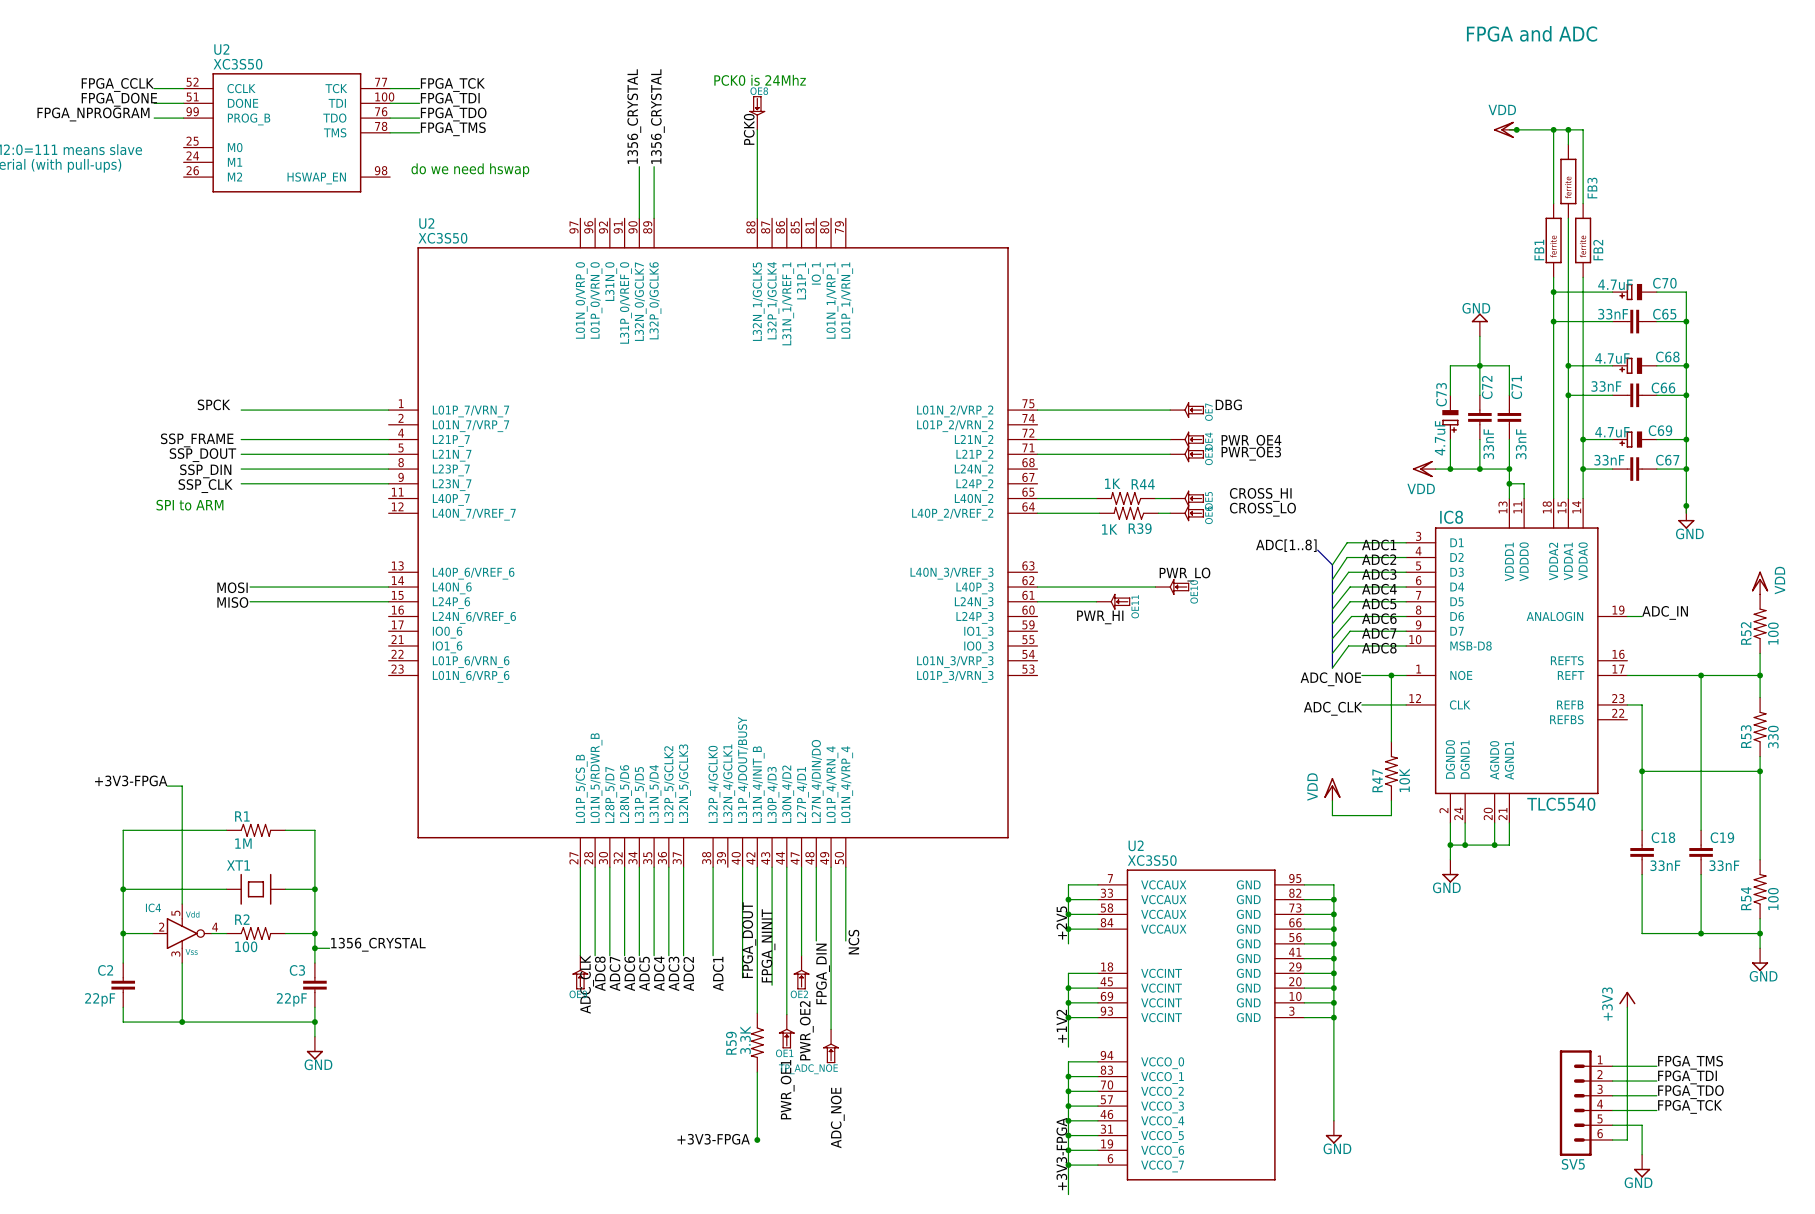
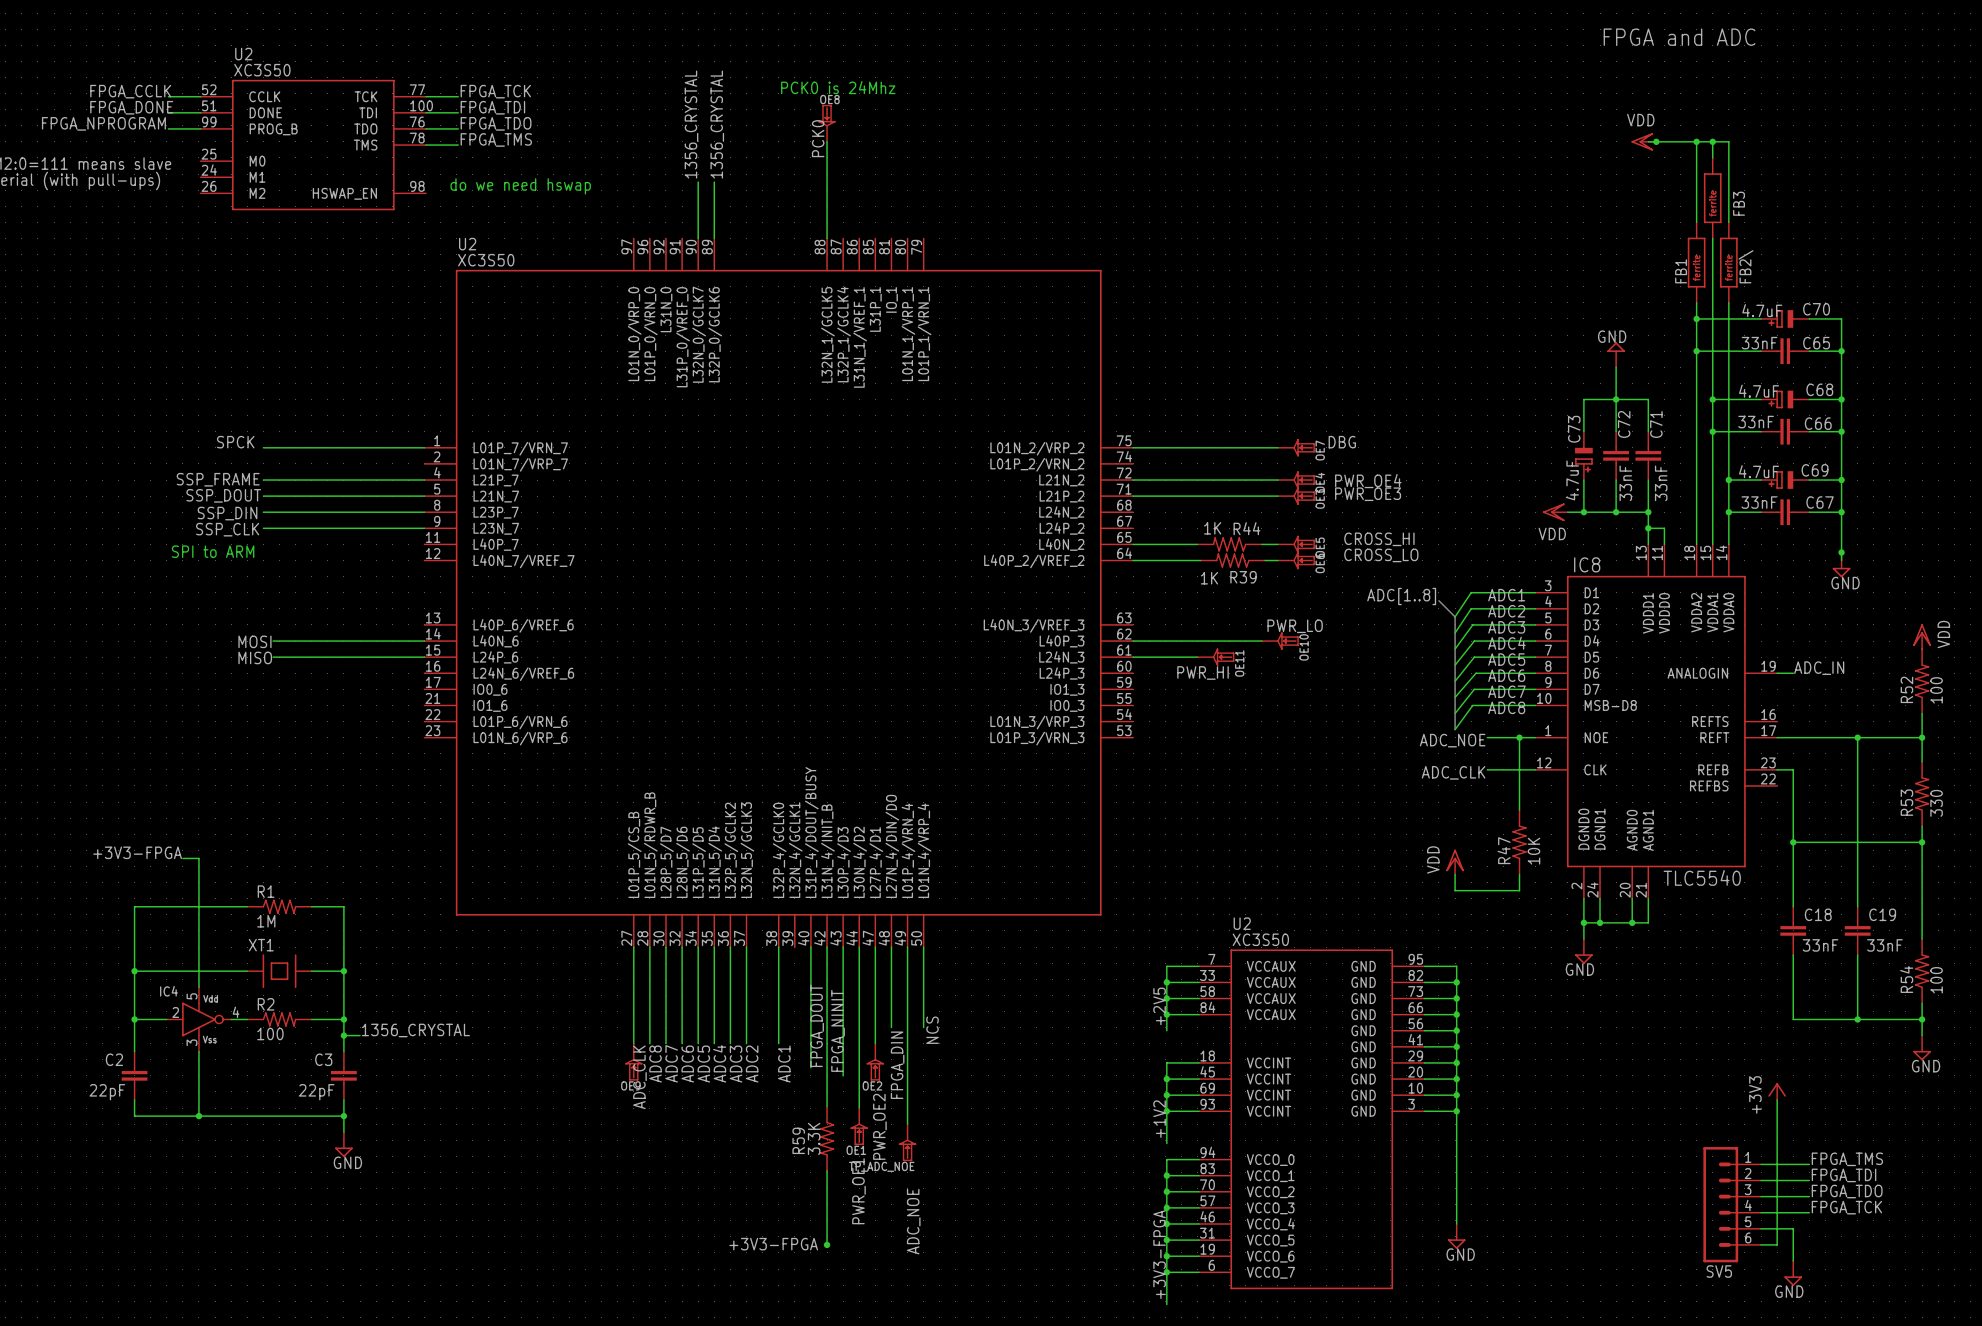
FB2 name: FB2 (1598, 250) -> FB2\ (1745, 266)

